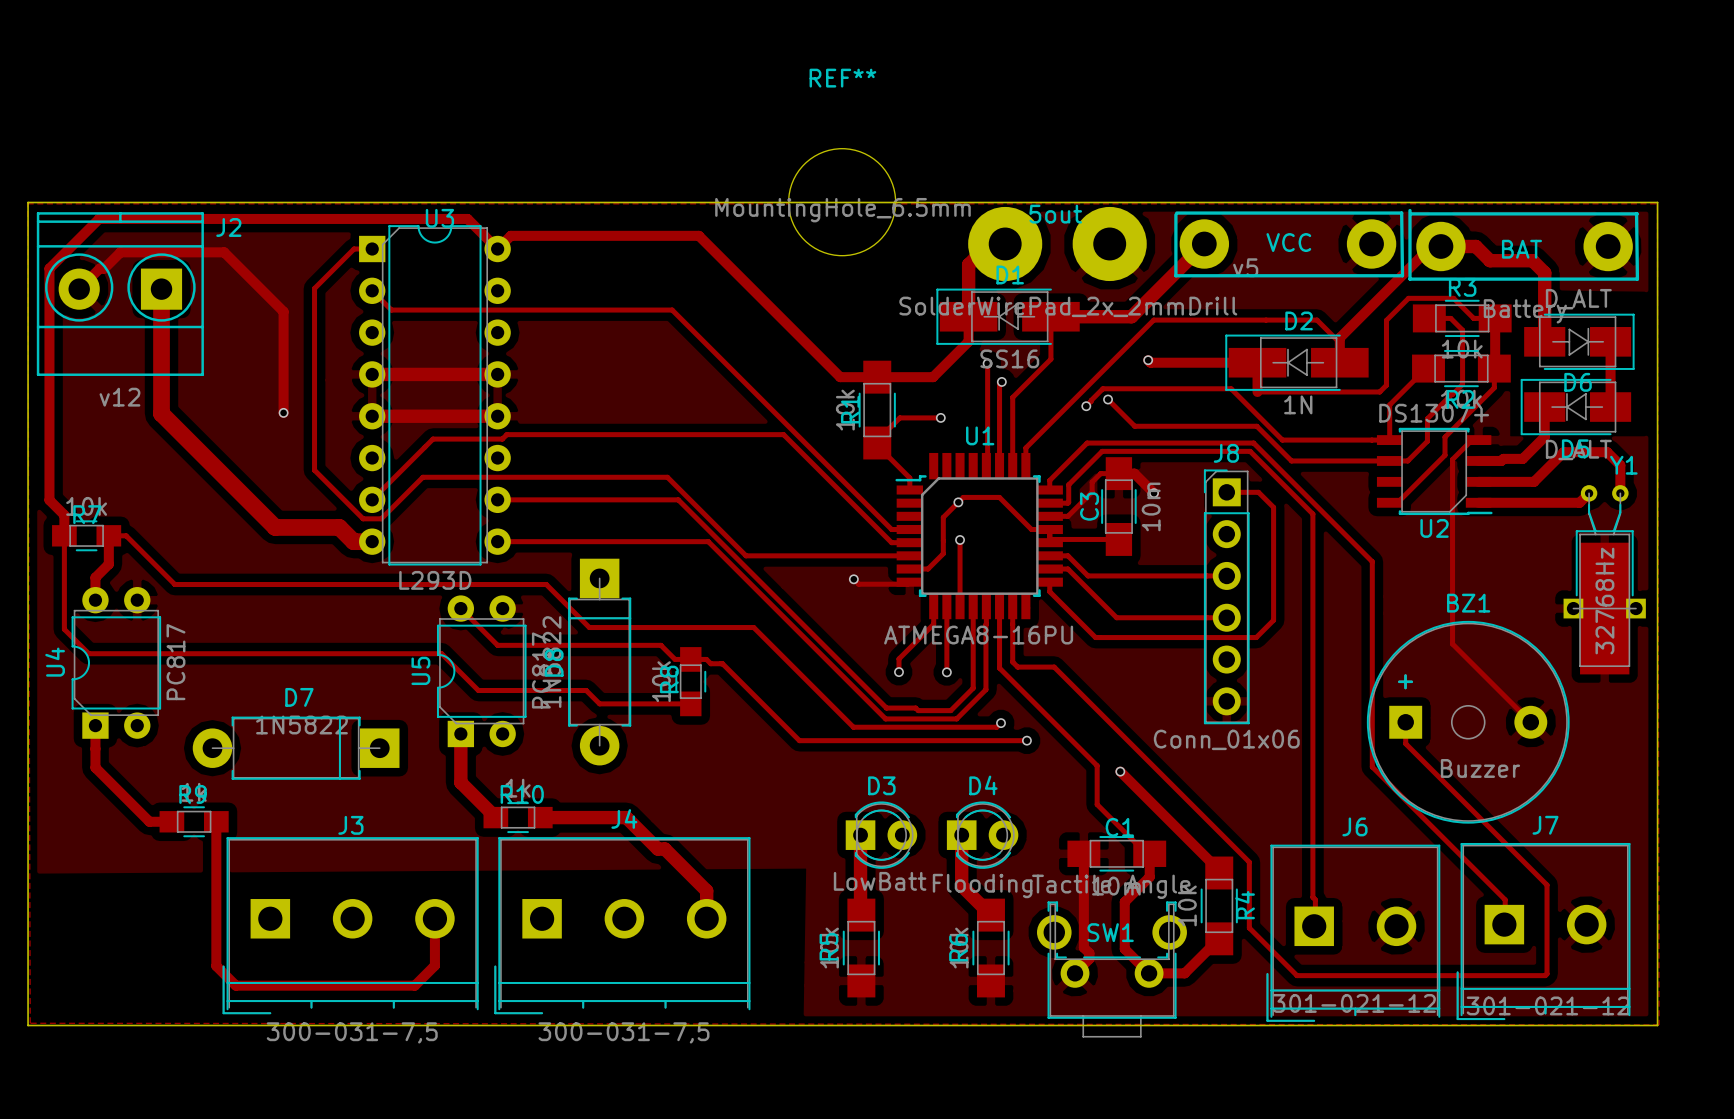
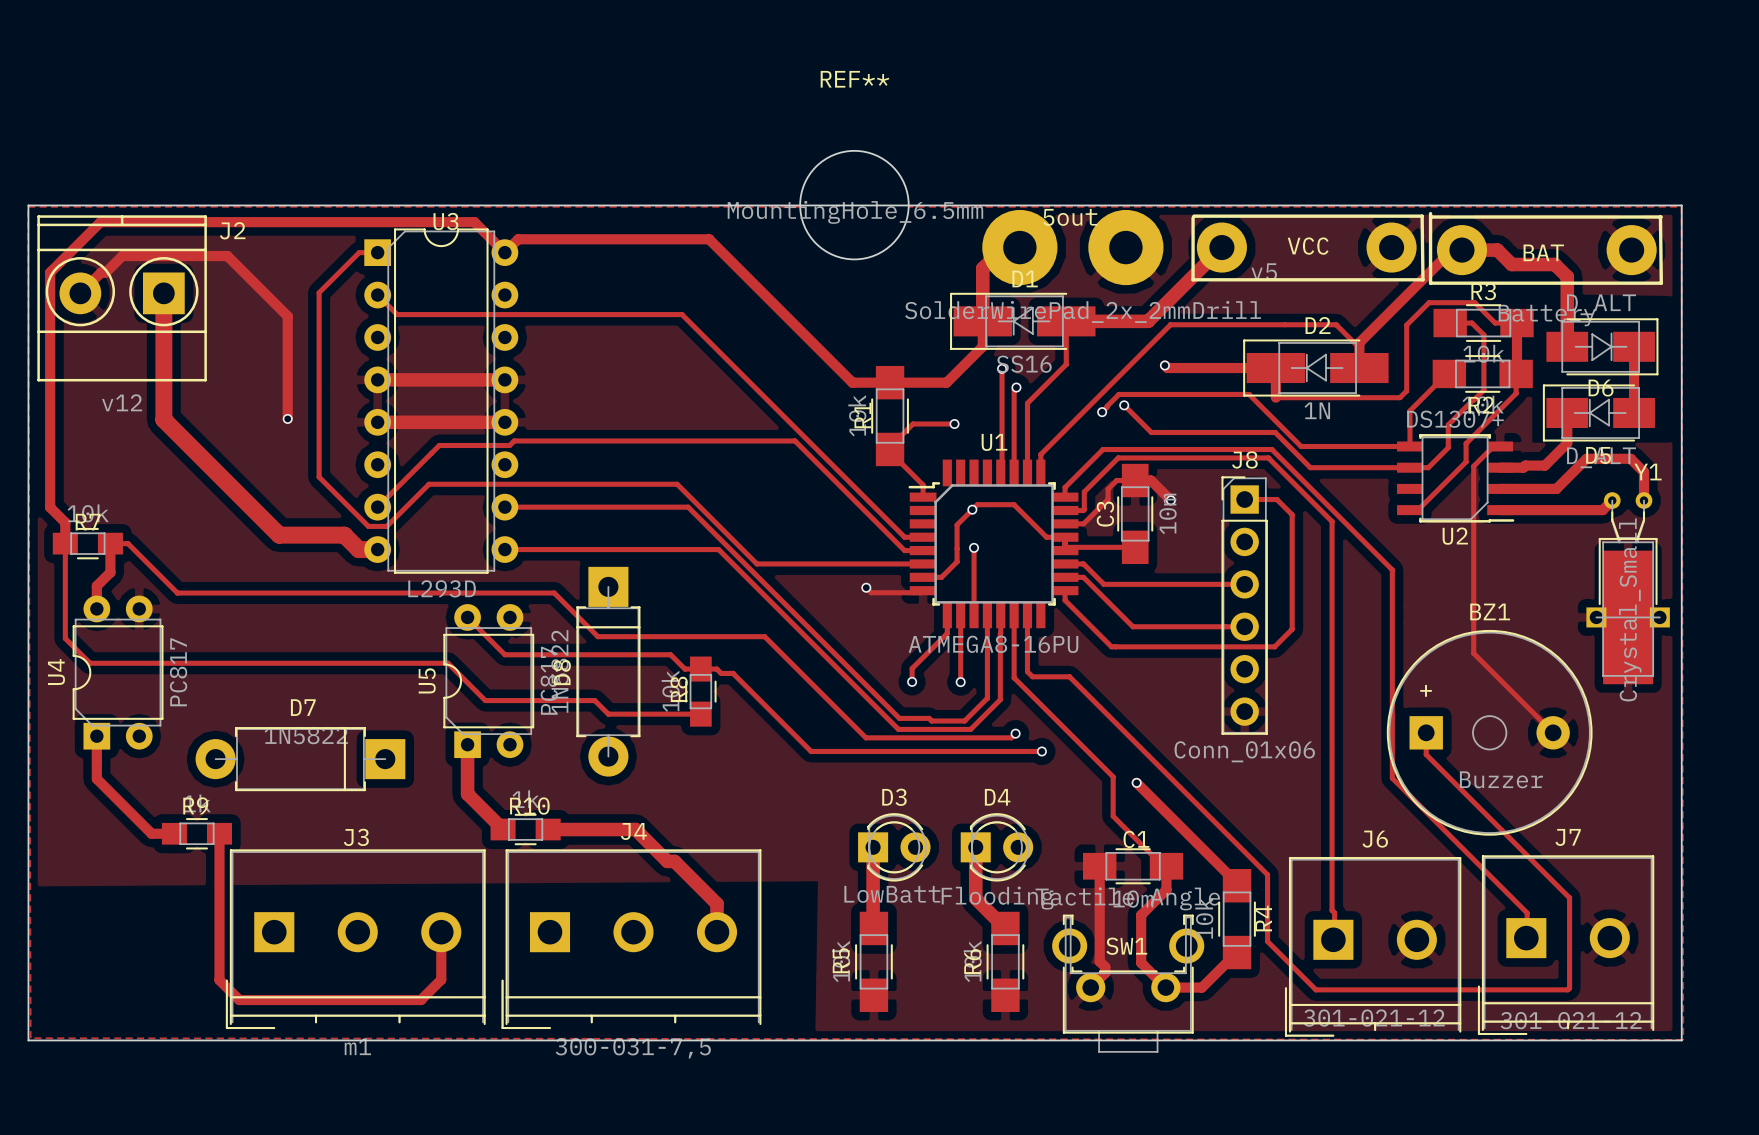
Y1 value: 32768Hz (1604, 601) -> Crystal_Small (1630, 609)
J3 value: 300-031-7,5 (352, 1032) -> m1 (357, 1046)

